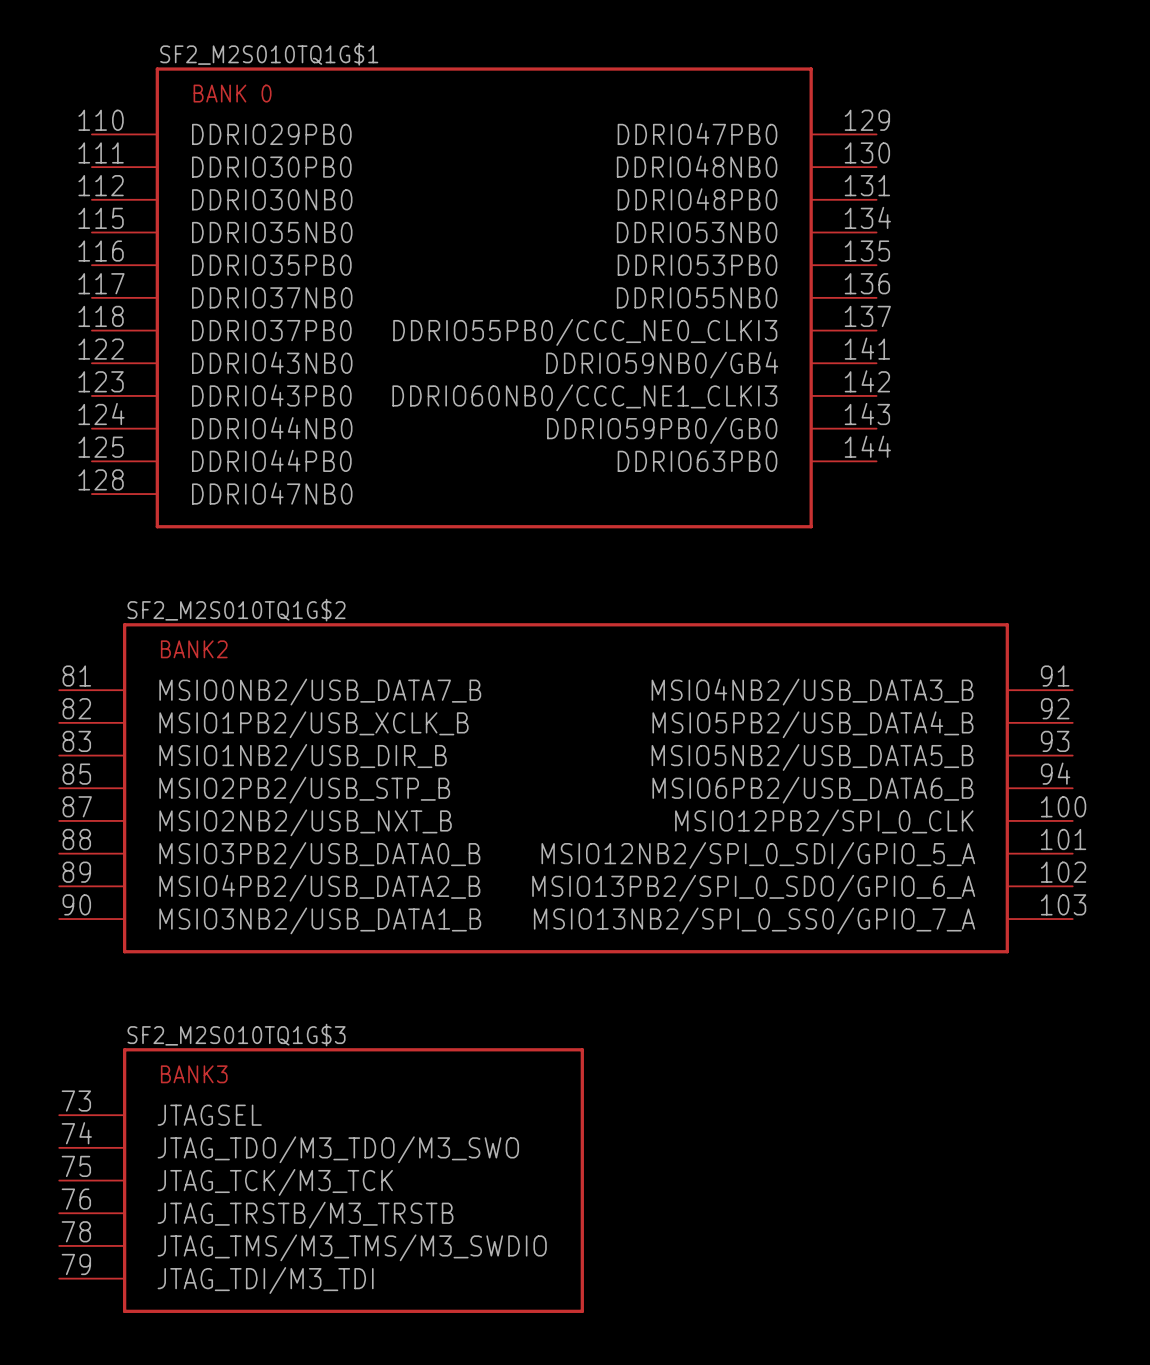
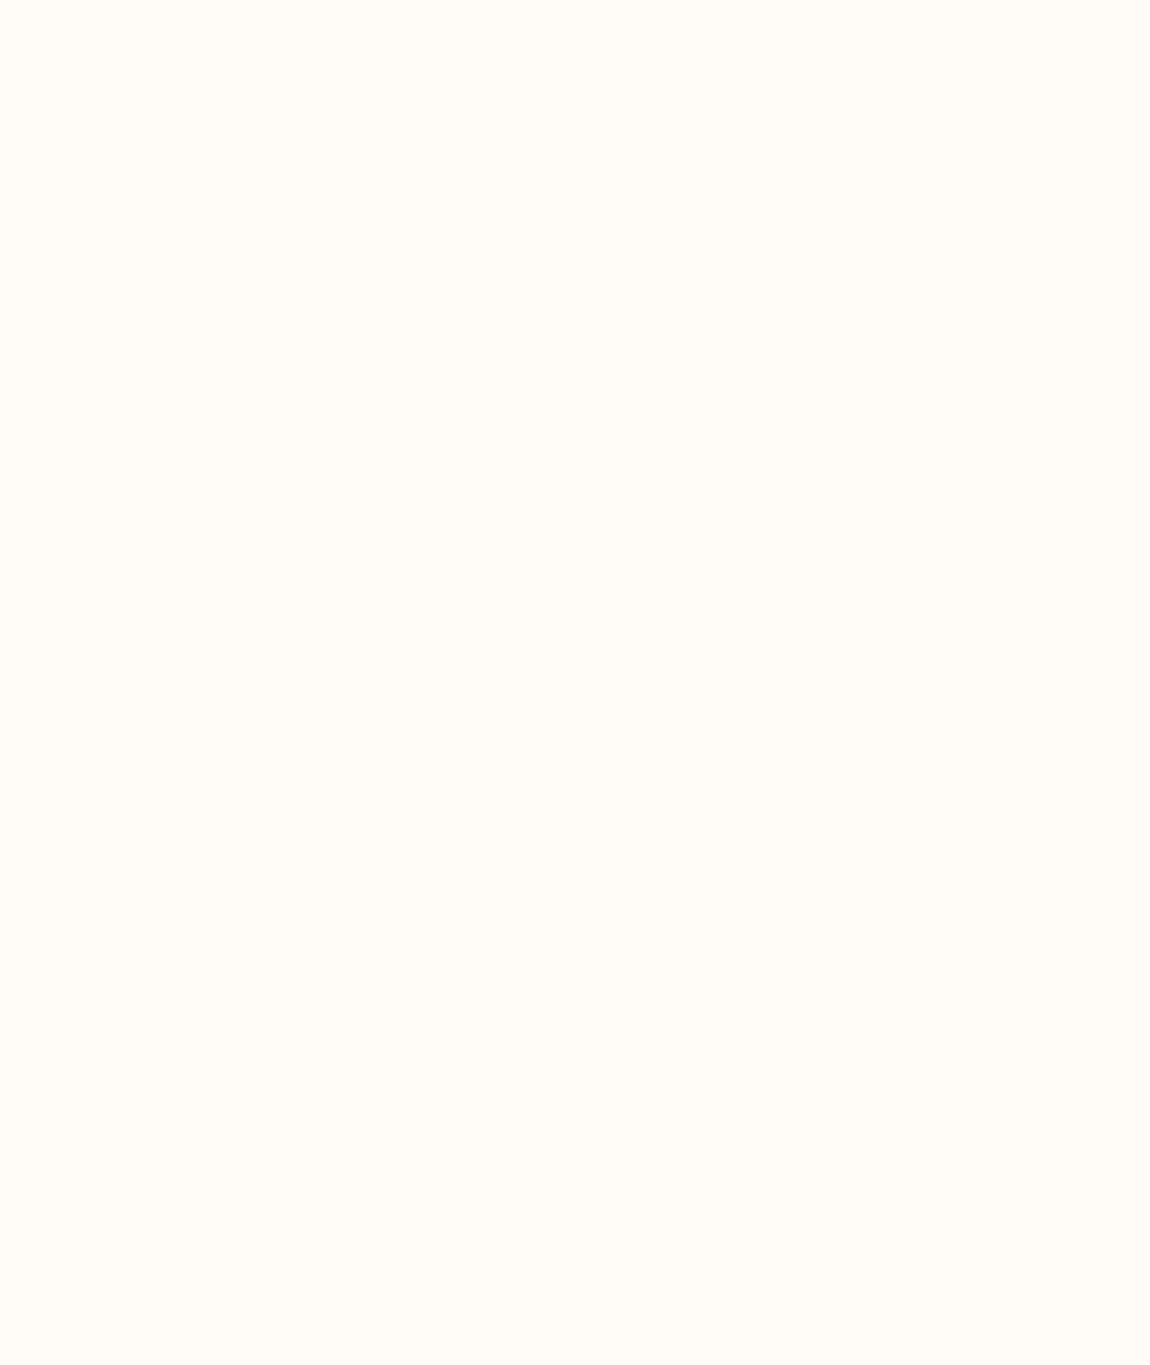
SF2_M2S010TQ1G$1: (484, 297) -> none
SF2_M2S010TQ1G$2: (565, 788) -> none
SF2_M2S010TQ1G$3: (321, 1180) -> none

